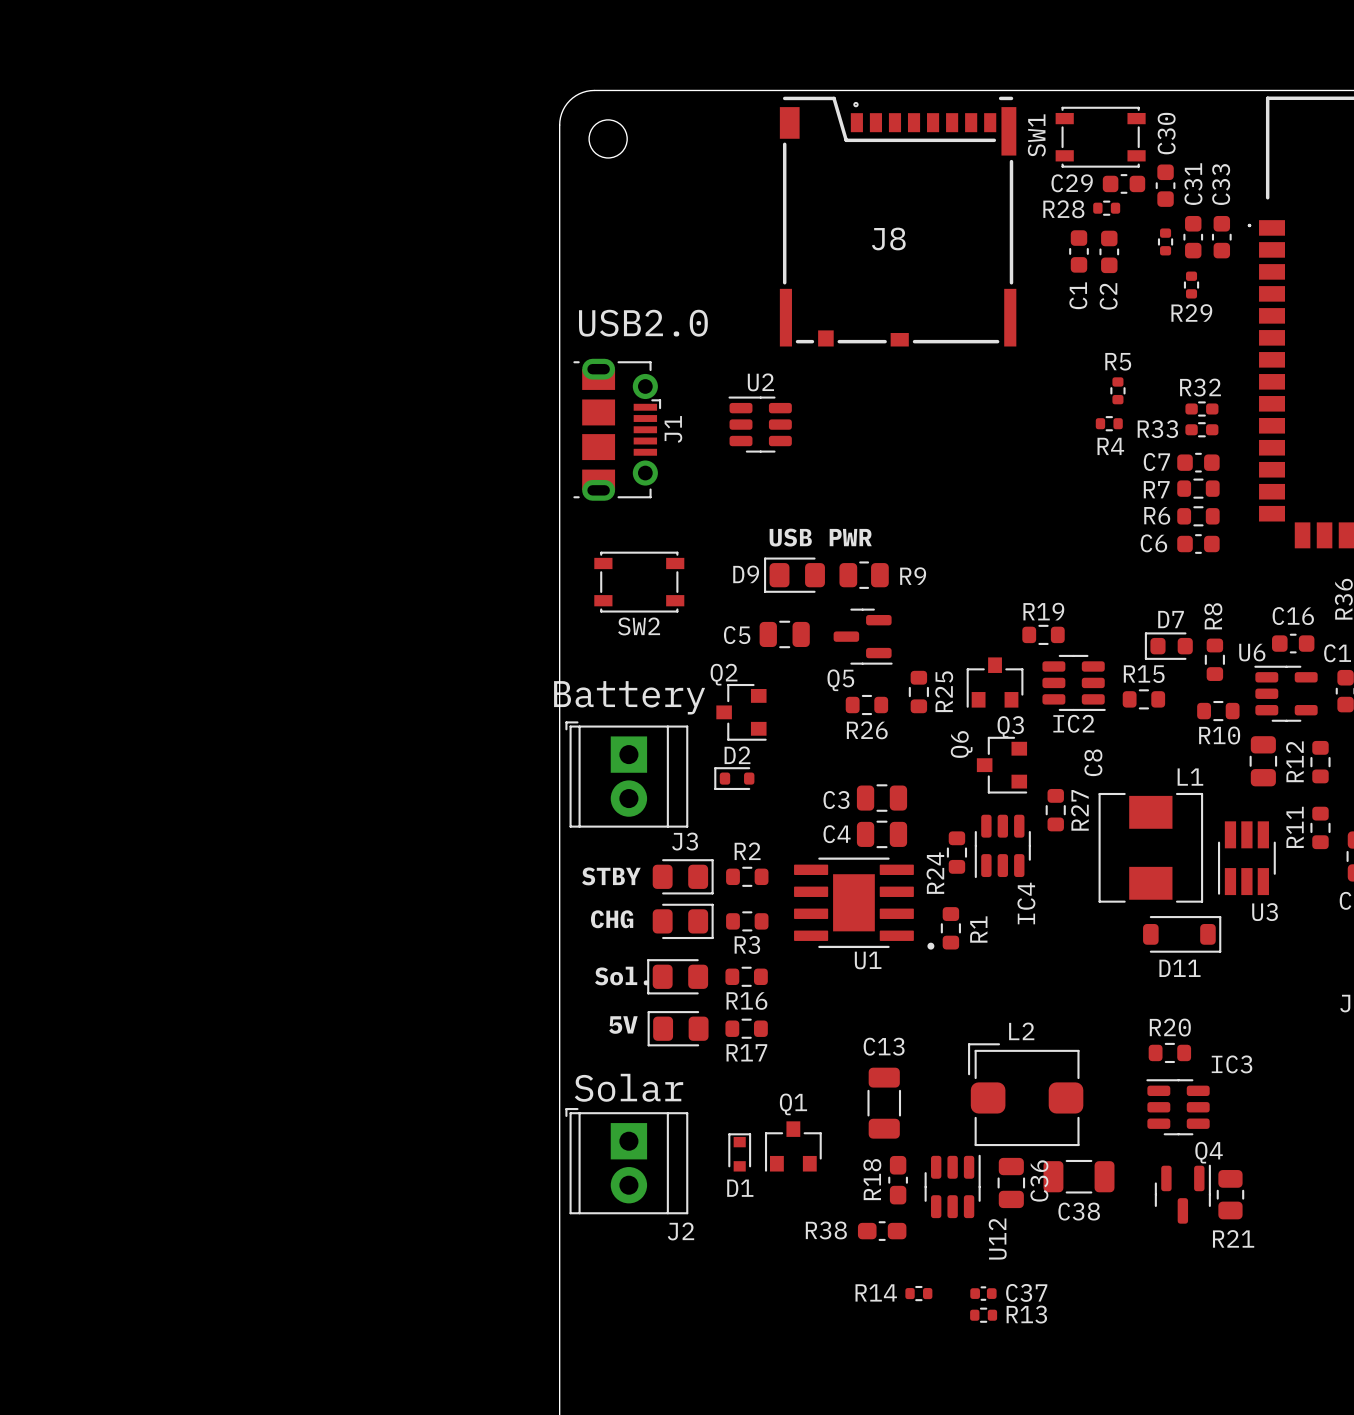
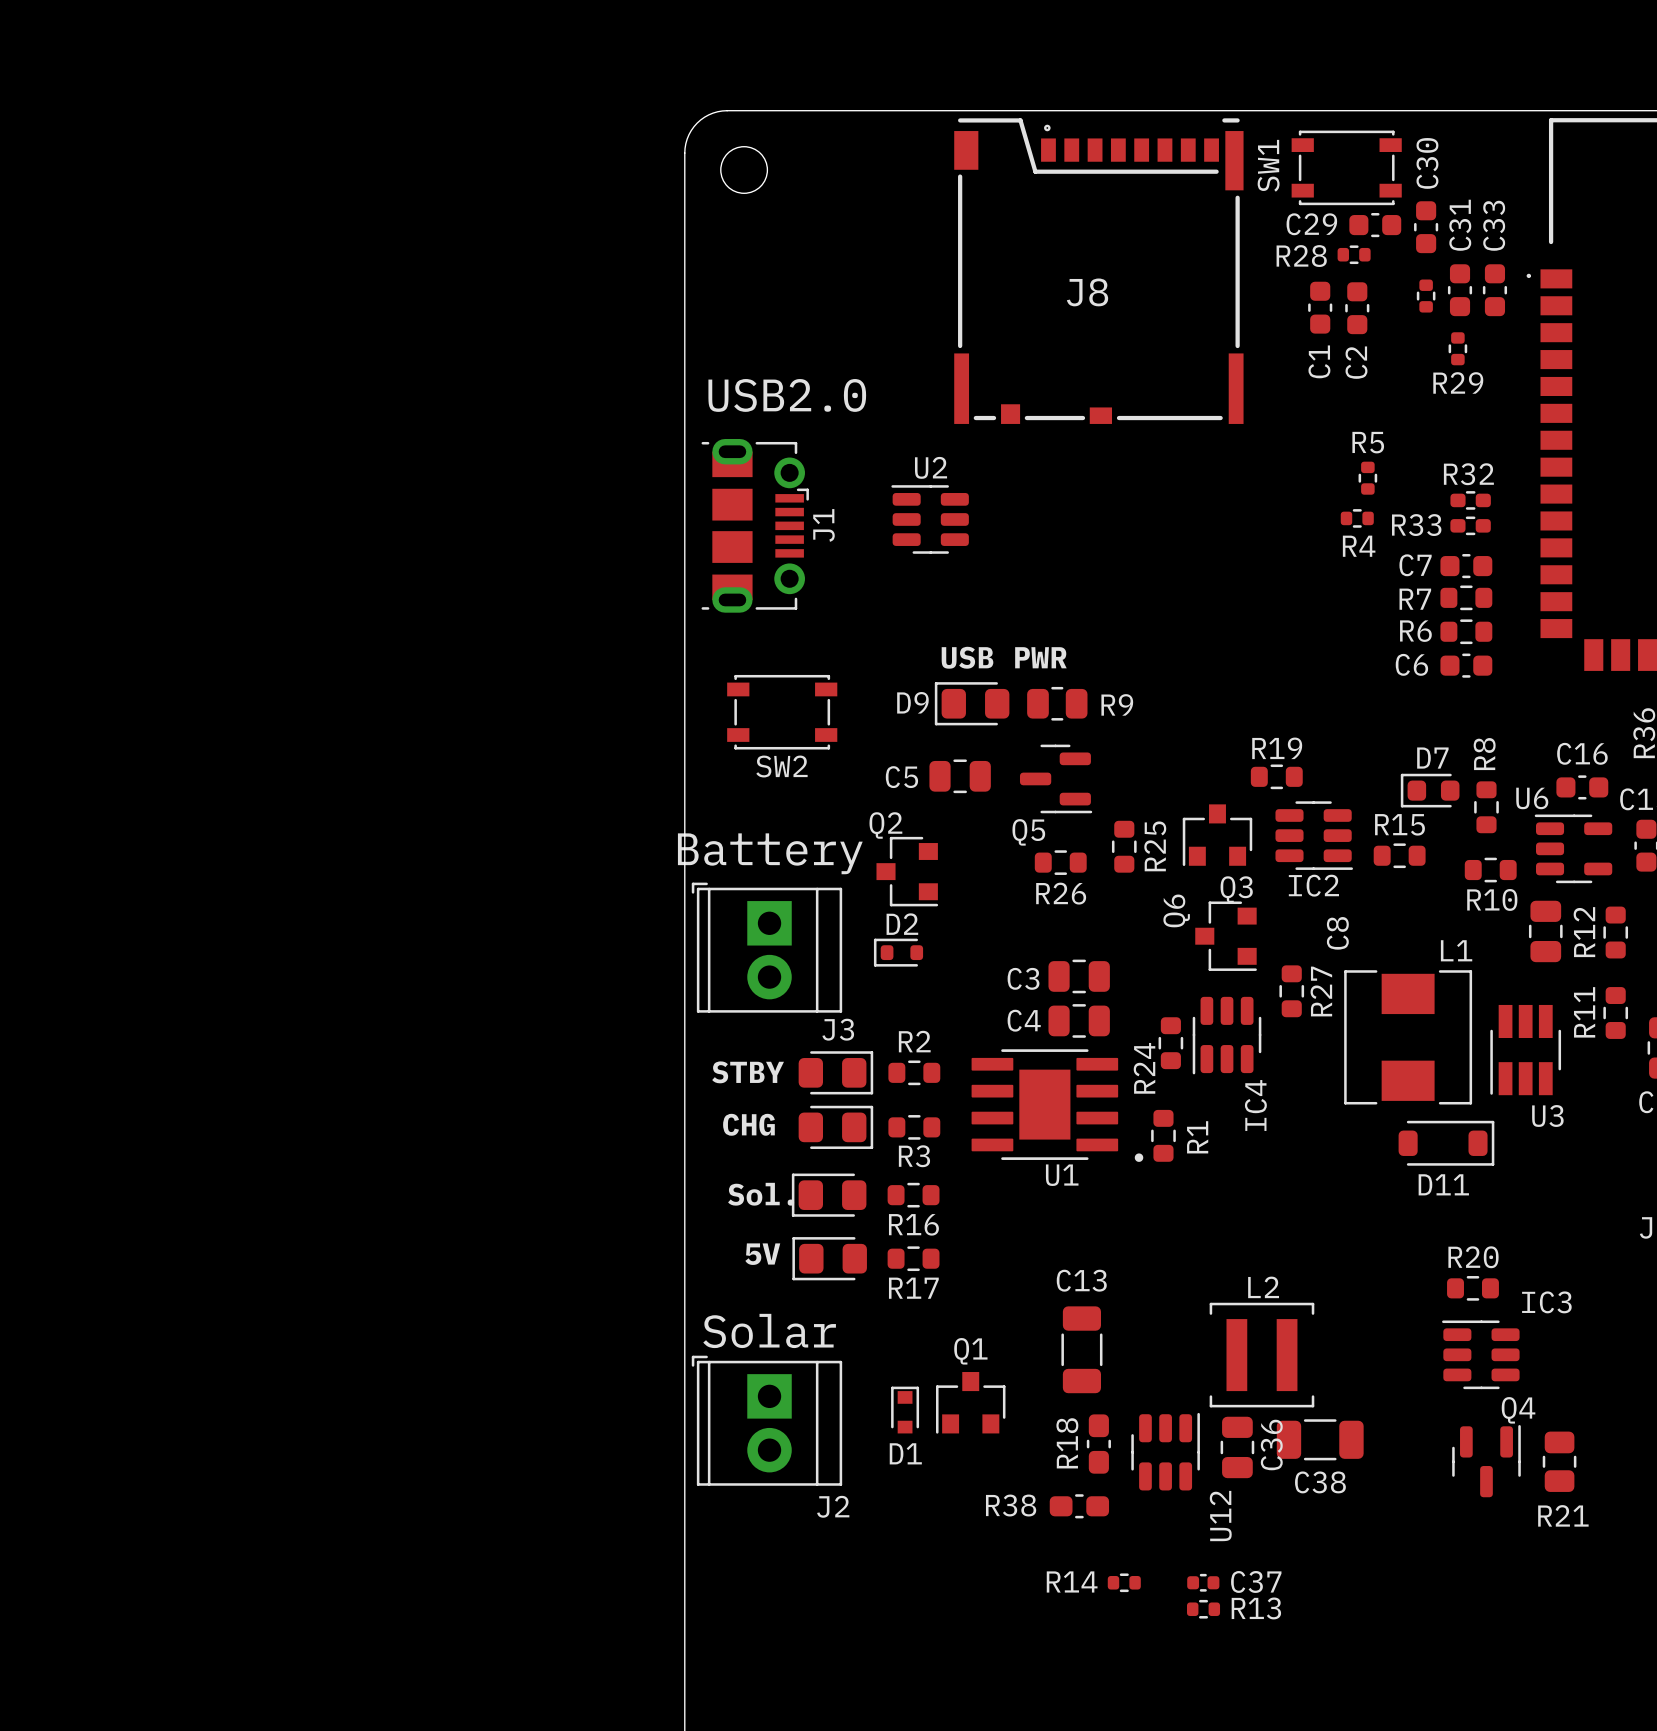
L2 footprint: [968, 1043, 1084, 1147] -> [1209, 1302, 1315, 1408]
R20 position: (1169, 1052) -> (1472, 1288)
IC3 position: (1178, 1107) -> (1480, 1354)
Q4 position: (1182, 1194) -> (1486, 1461)
R21 position: (1230, 1194) -> (1559, 1461)

